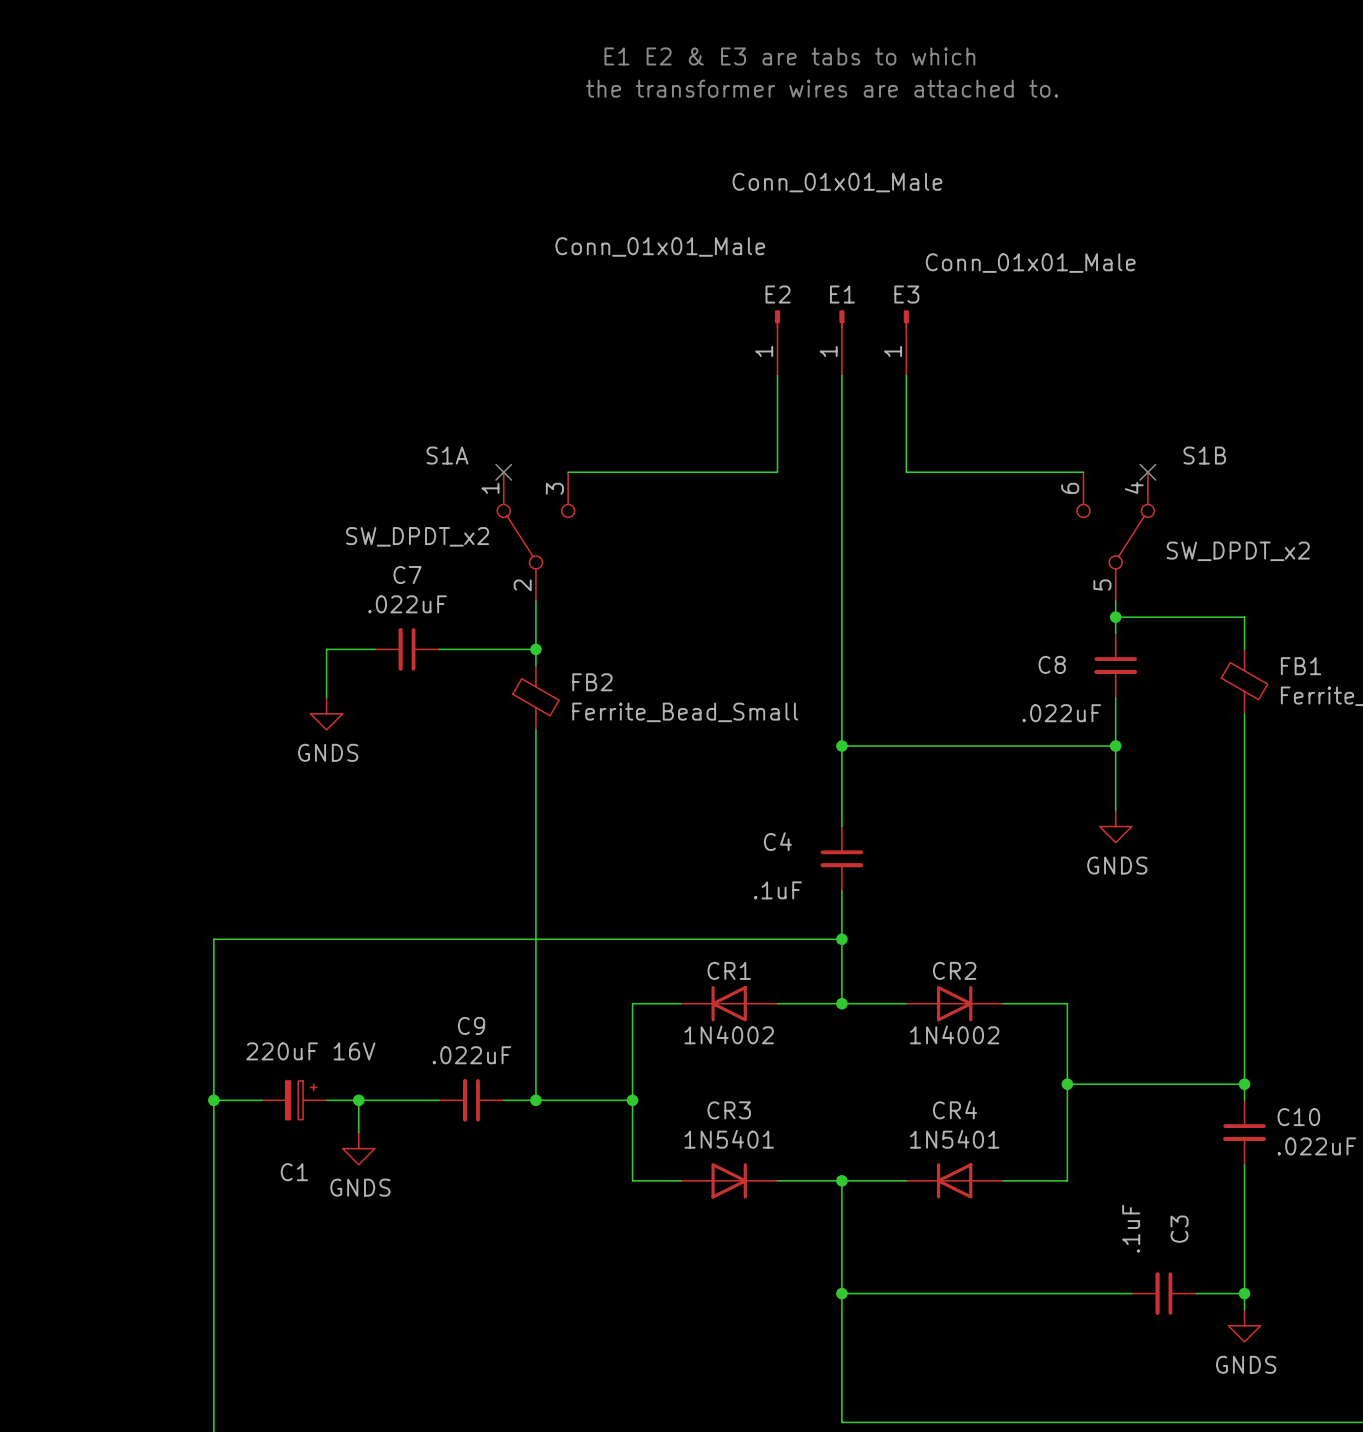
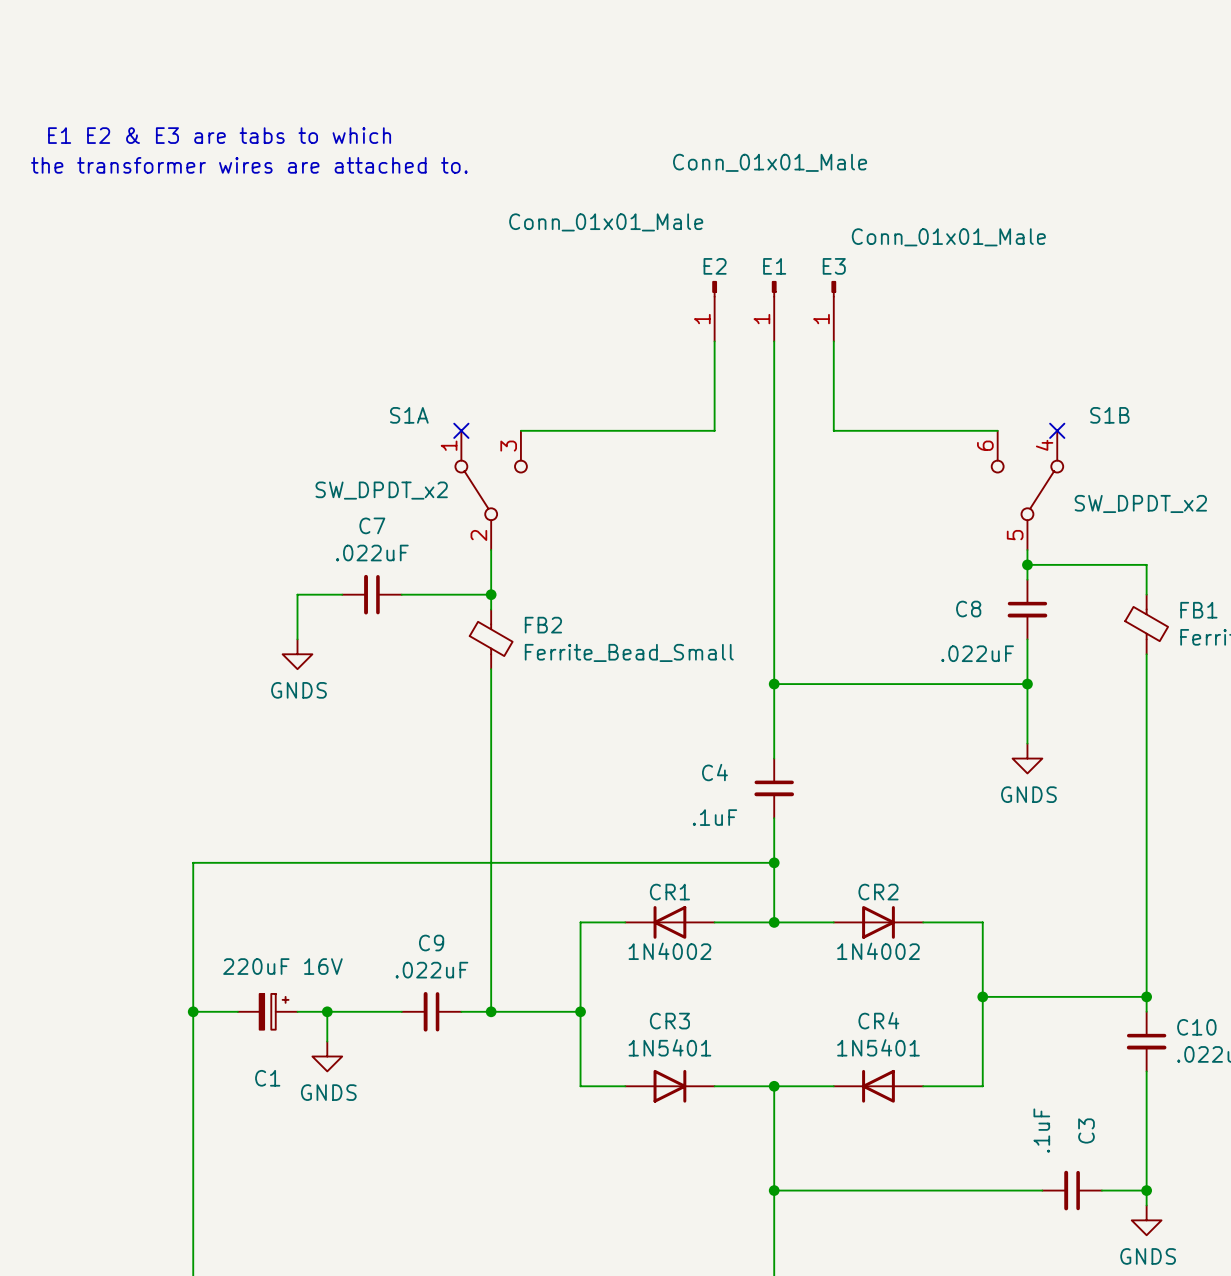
text: E1 E2 & E3 are tabs to which (789, 56) -> none
text: the transformer wires are attached to. (822, 88) -> none
text: none -> E1 E2 & E3 are tabs to which (219, 135)
text: none -> the transformer wires are attached to. (249, 165)

